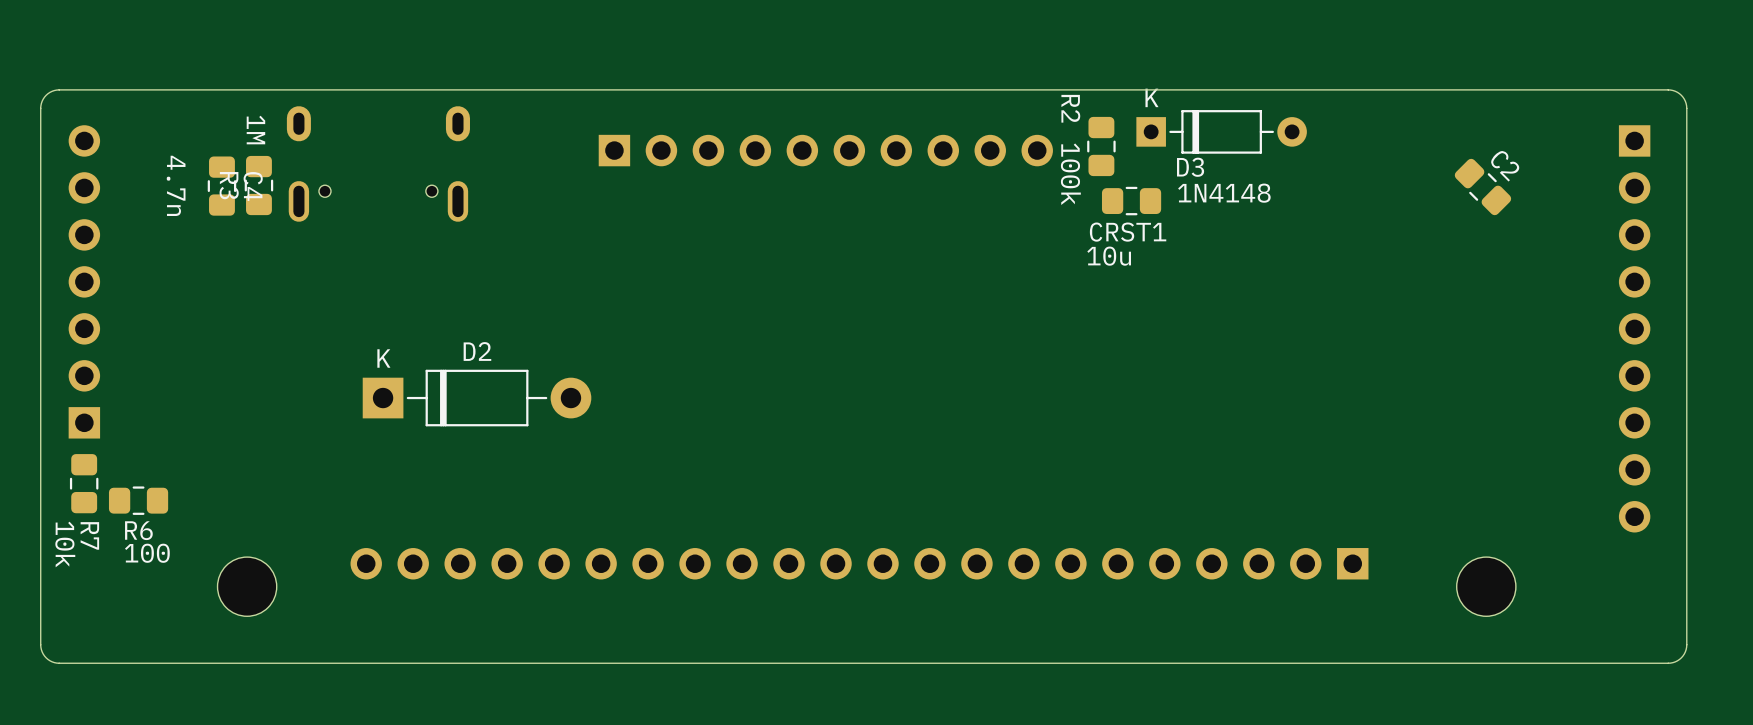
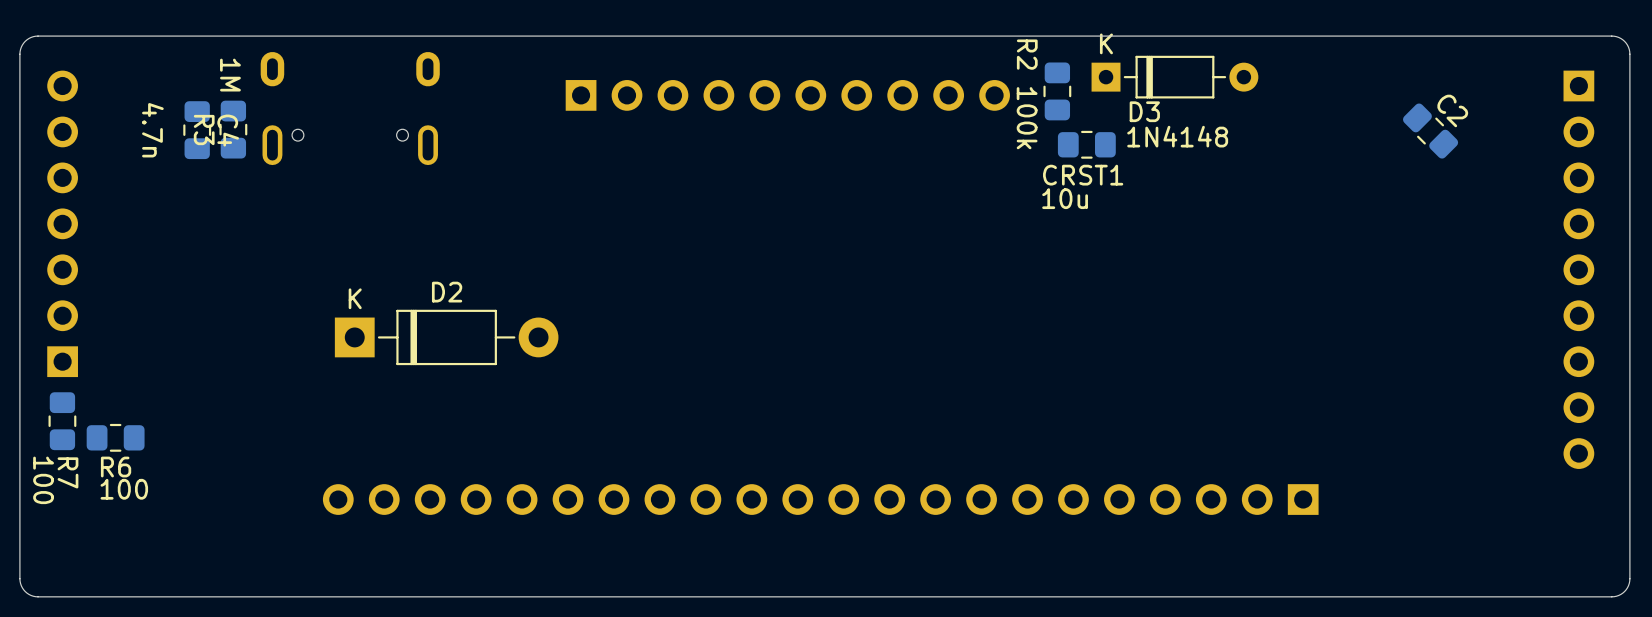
R7 value: 10k (65, 544) -> 100 (43, 480)
part: (247, 586) -> none
part: (1486, 586) -> none

